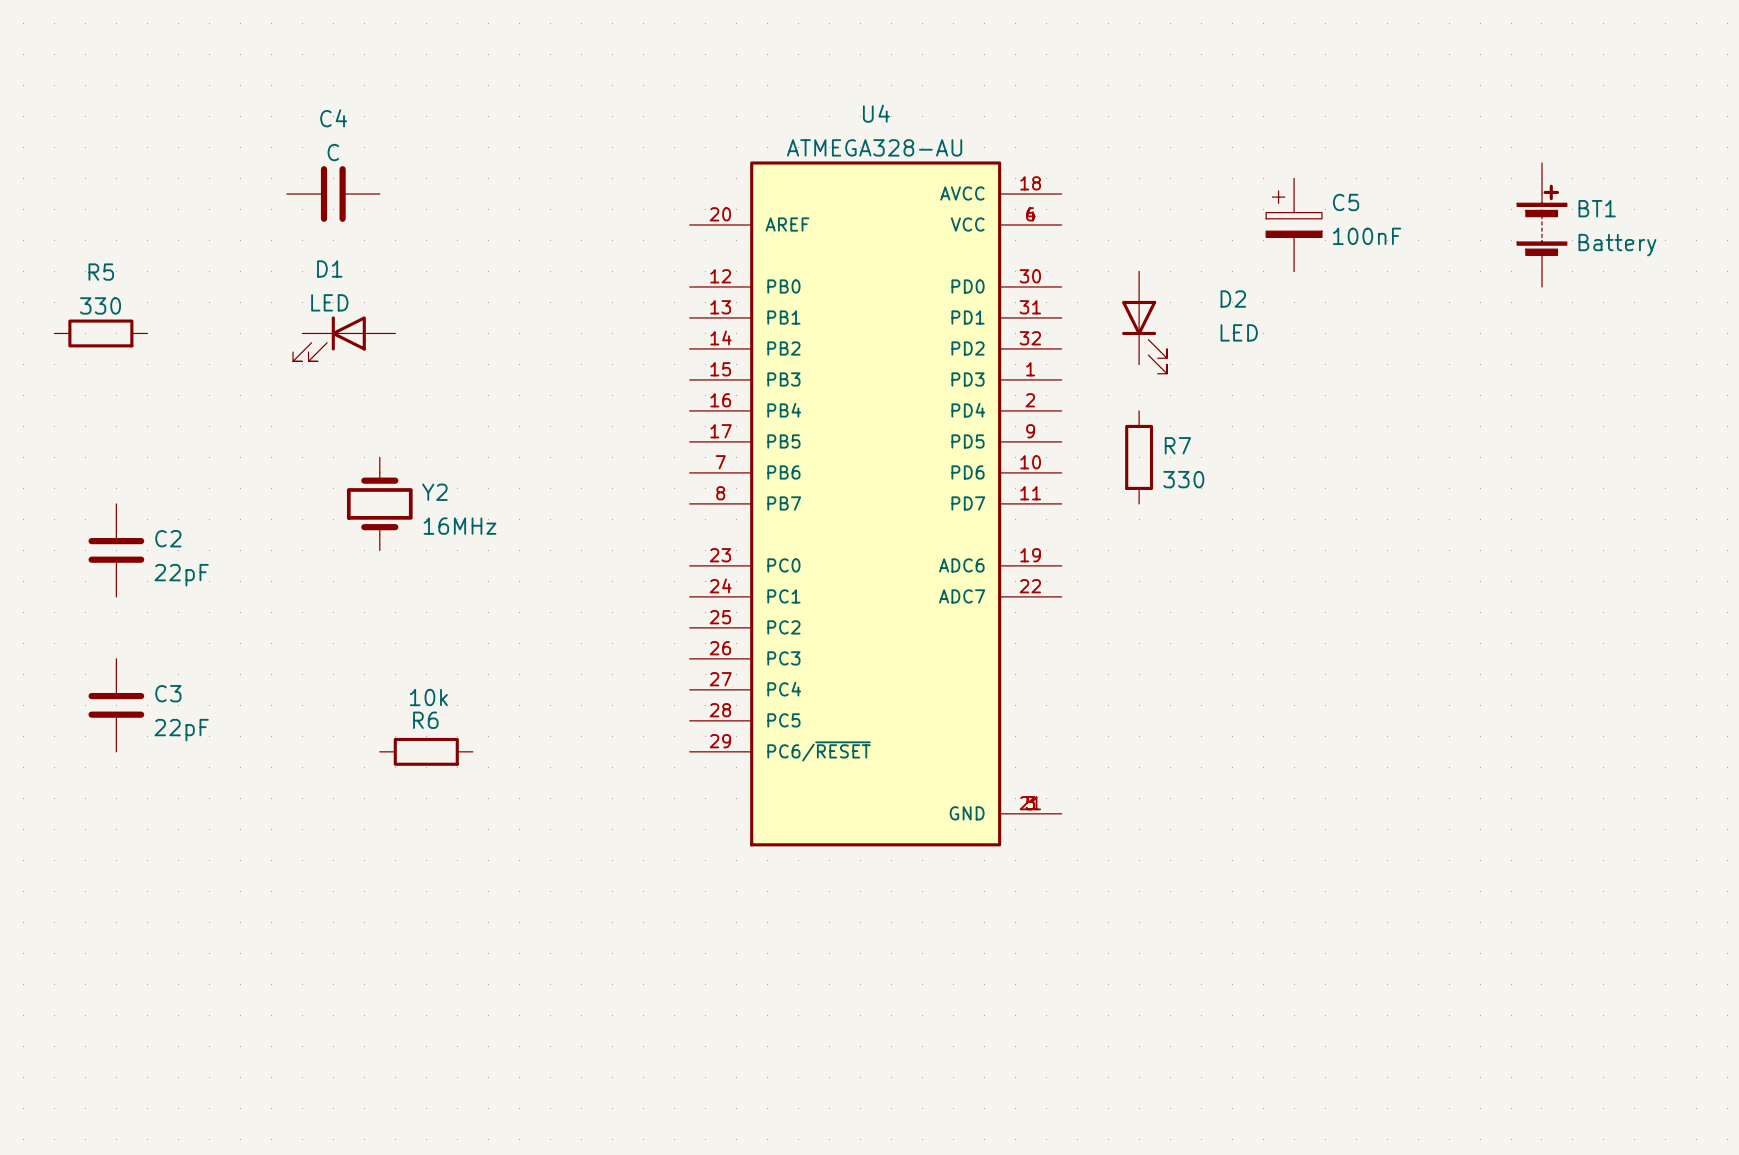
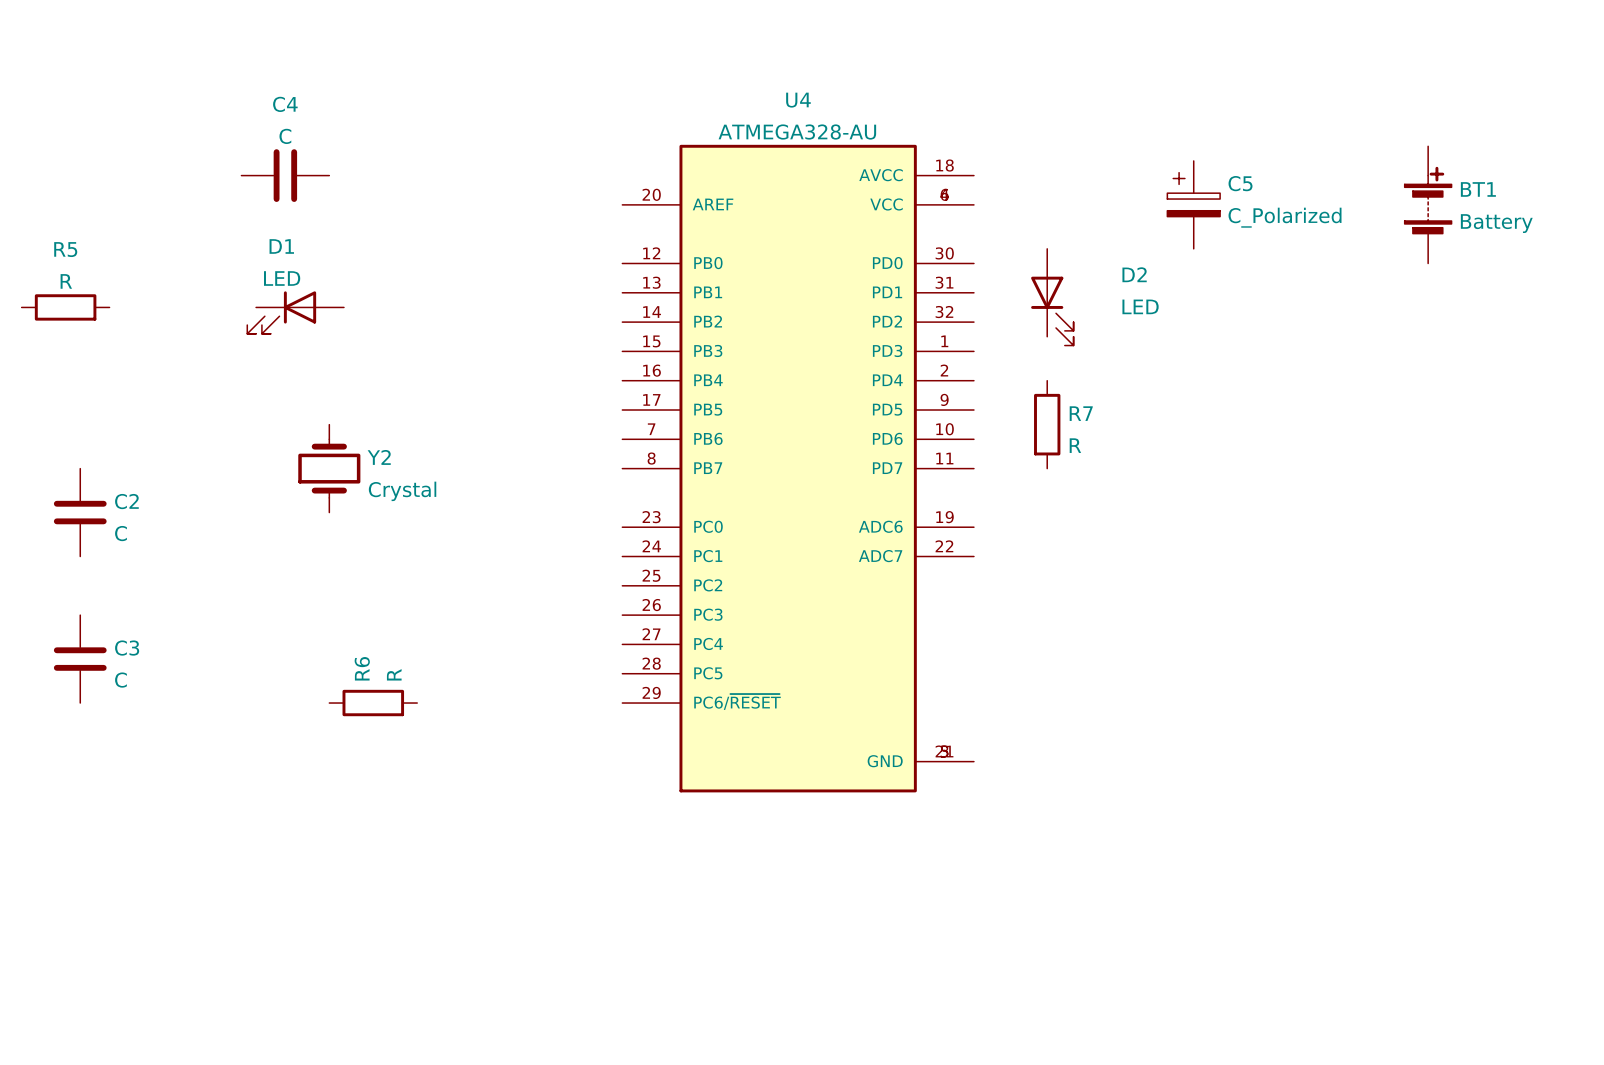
C5 value: 100nF (1367, 236) -> C_Polarized (1285, 217)
R5 value: 330 (100, 305) -> R (66, 281)
R7 value: 330 (1183, 479) -> R (1075, 445)
Y2 value: 16MHz (459, 526) -> Crystal (402, 491)
C2 value: 22pF (181, 575) -> C (120, 533)
R6 value: 10k (428, 697) -> R (394, 674)
R6 name rotation: 0° (425, 720) -> 90° counterclockwise (362, 668)
C3 value: 22pF (181, 730) -> C (120, 680)

